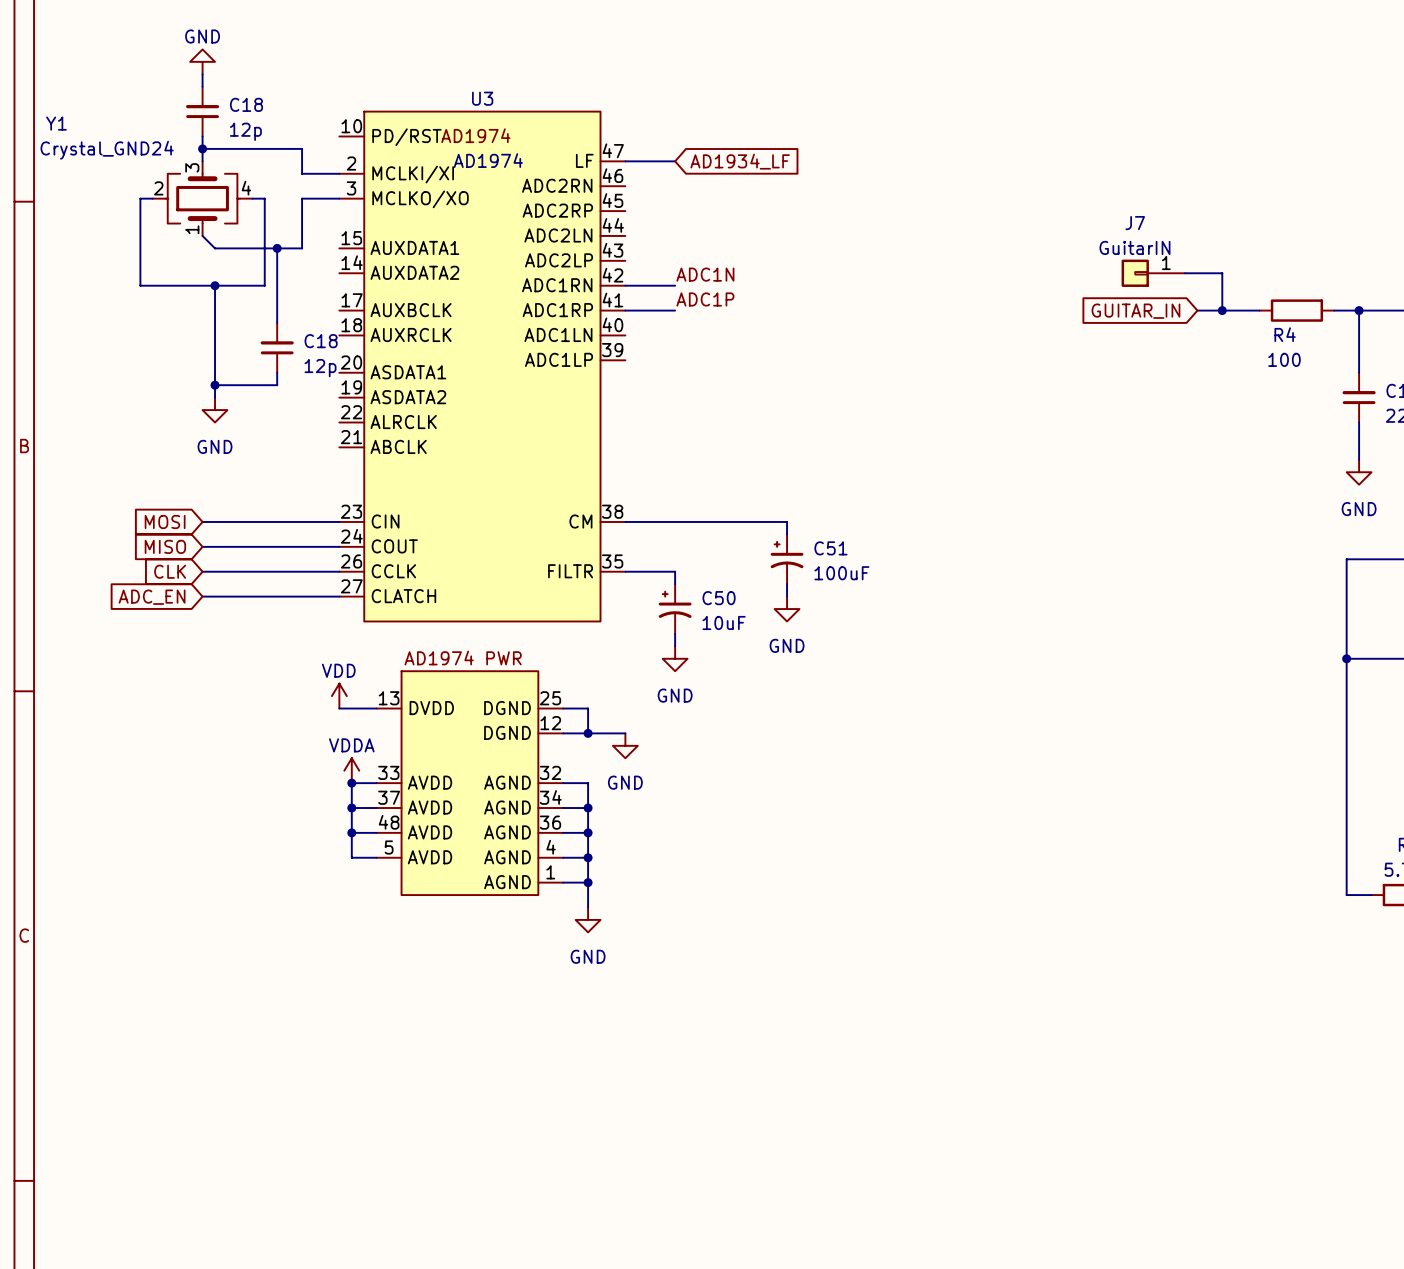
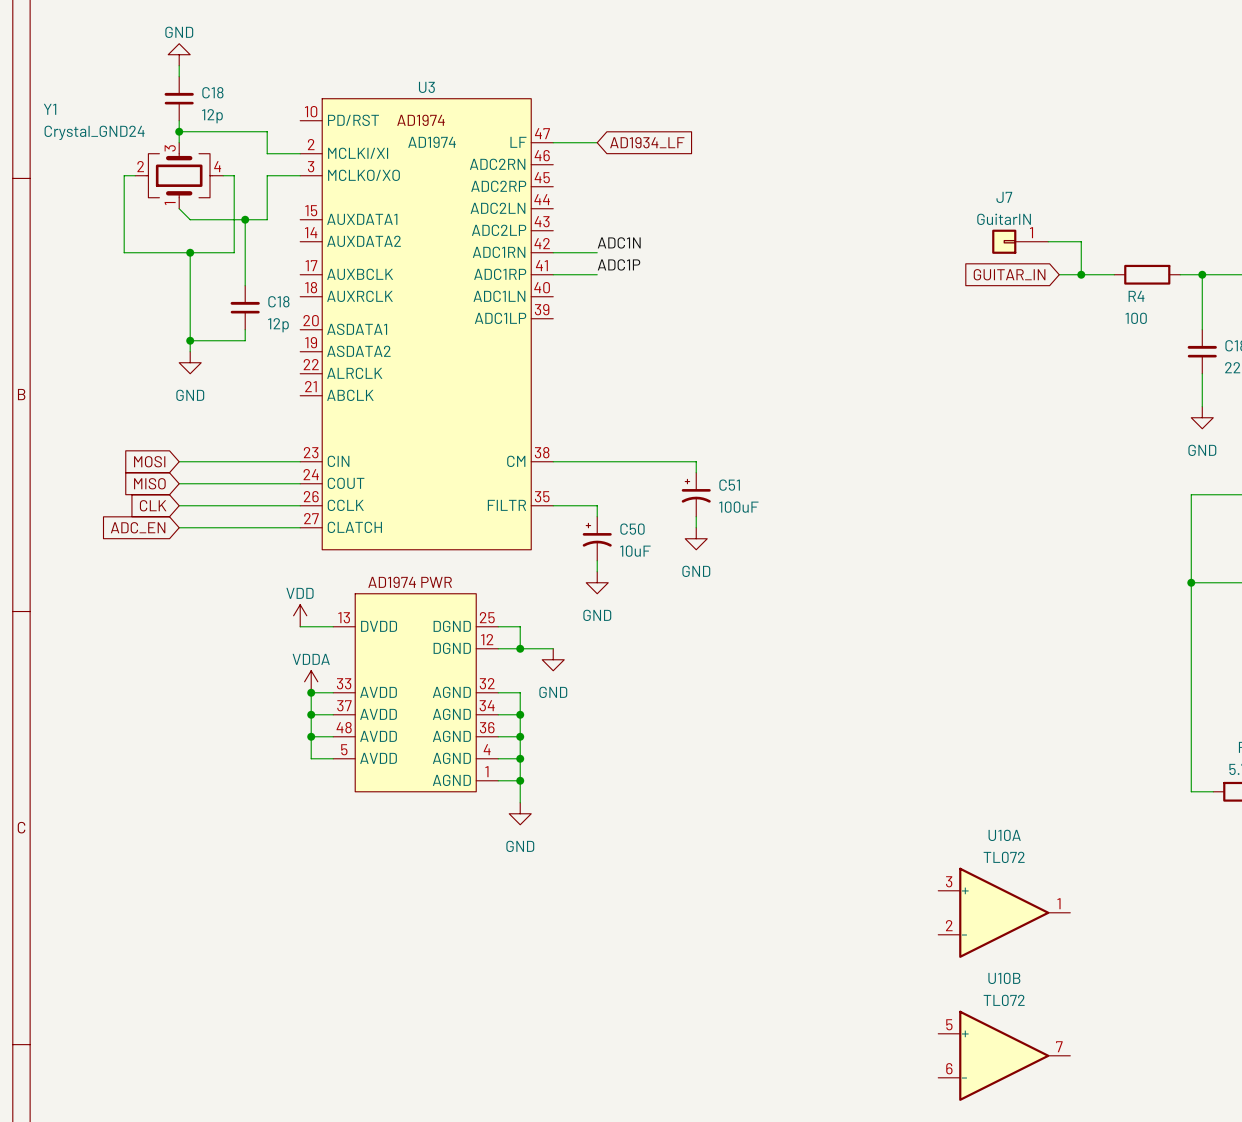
U10A: none -> TL072 (1004, 912)
U10B: none -> TL072 (1004, 1055)

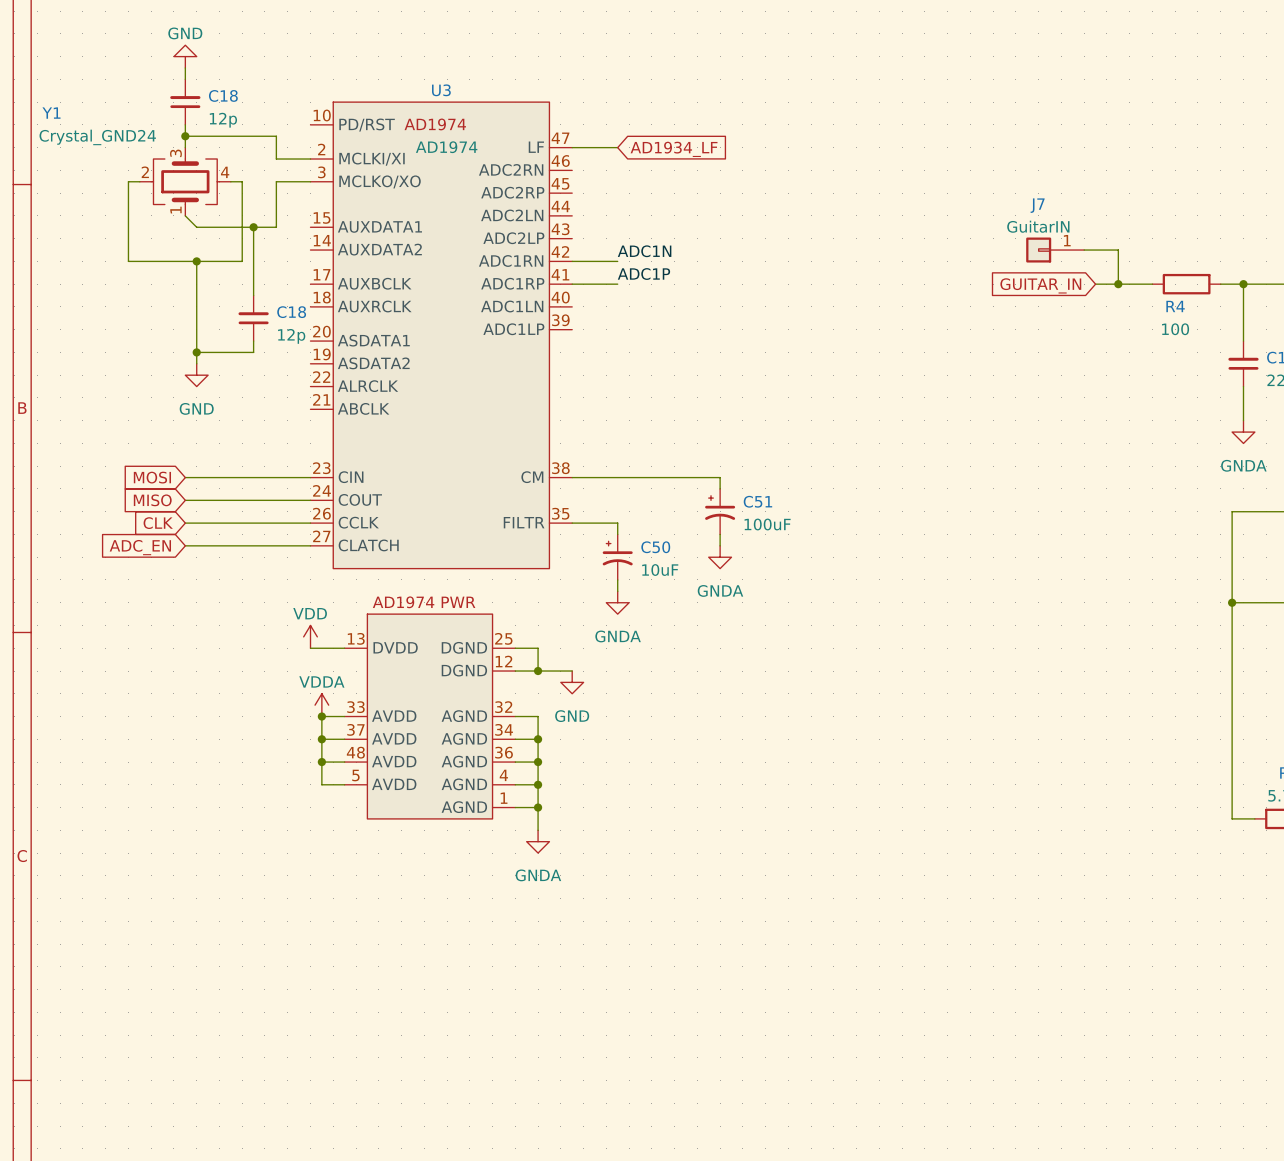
power symbol: GND (1202, 417) -> GNDA (1243, 432)
power symbol: GND (696, 538) -> GNDA (720, 557)
power symbol: GND (597, 582) -> GNDA (617, 602)
power symbol: GND (520, 813) -> GNDA (538, 841)
U10A: TL072 (1004, 912) -> none
U10B: TL072 (1004, 1055) -> none

